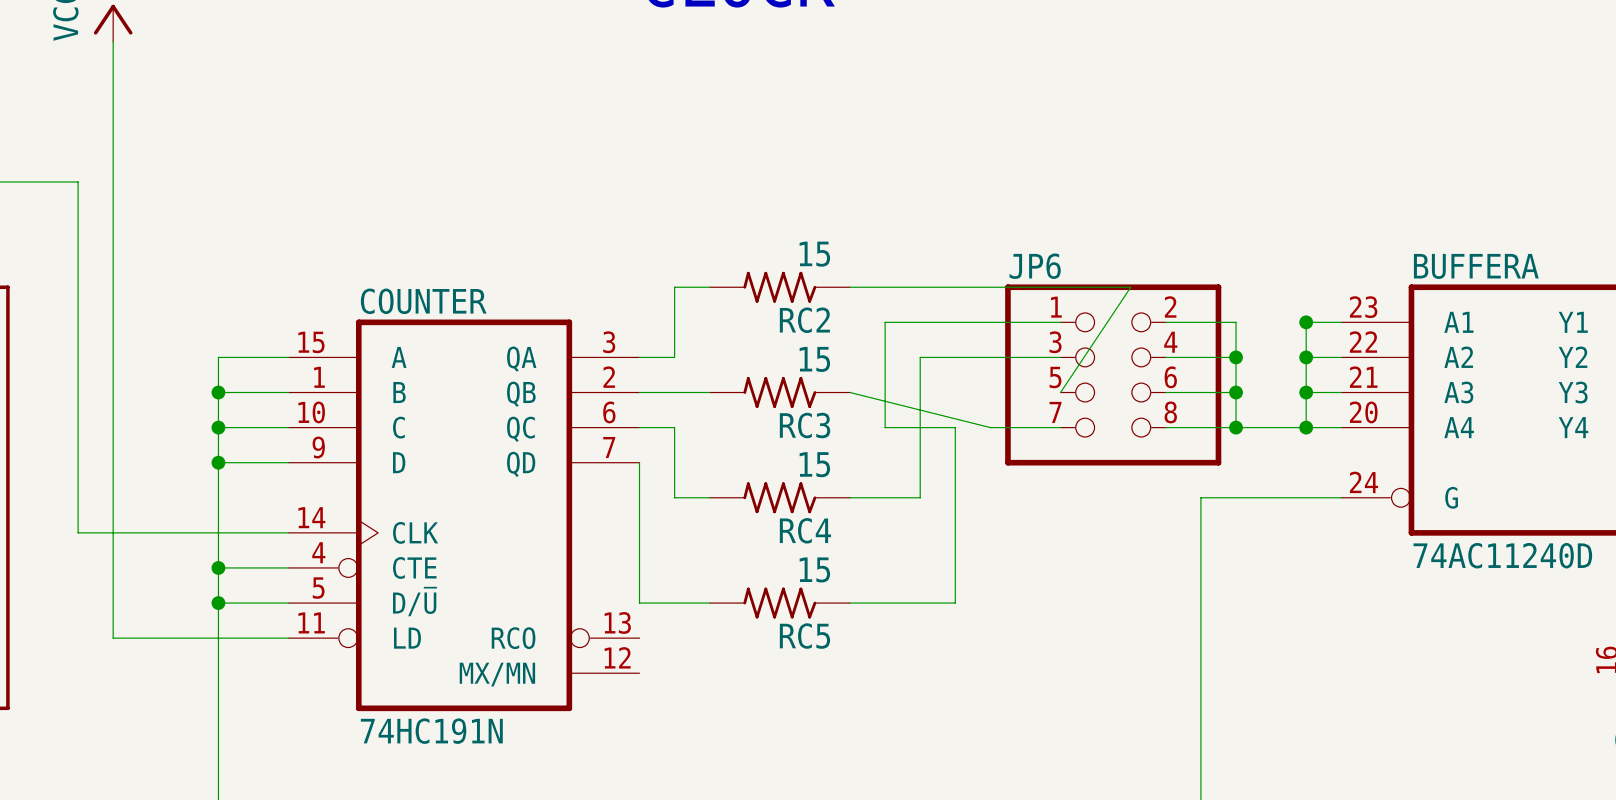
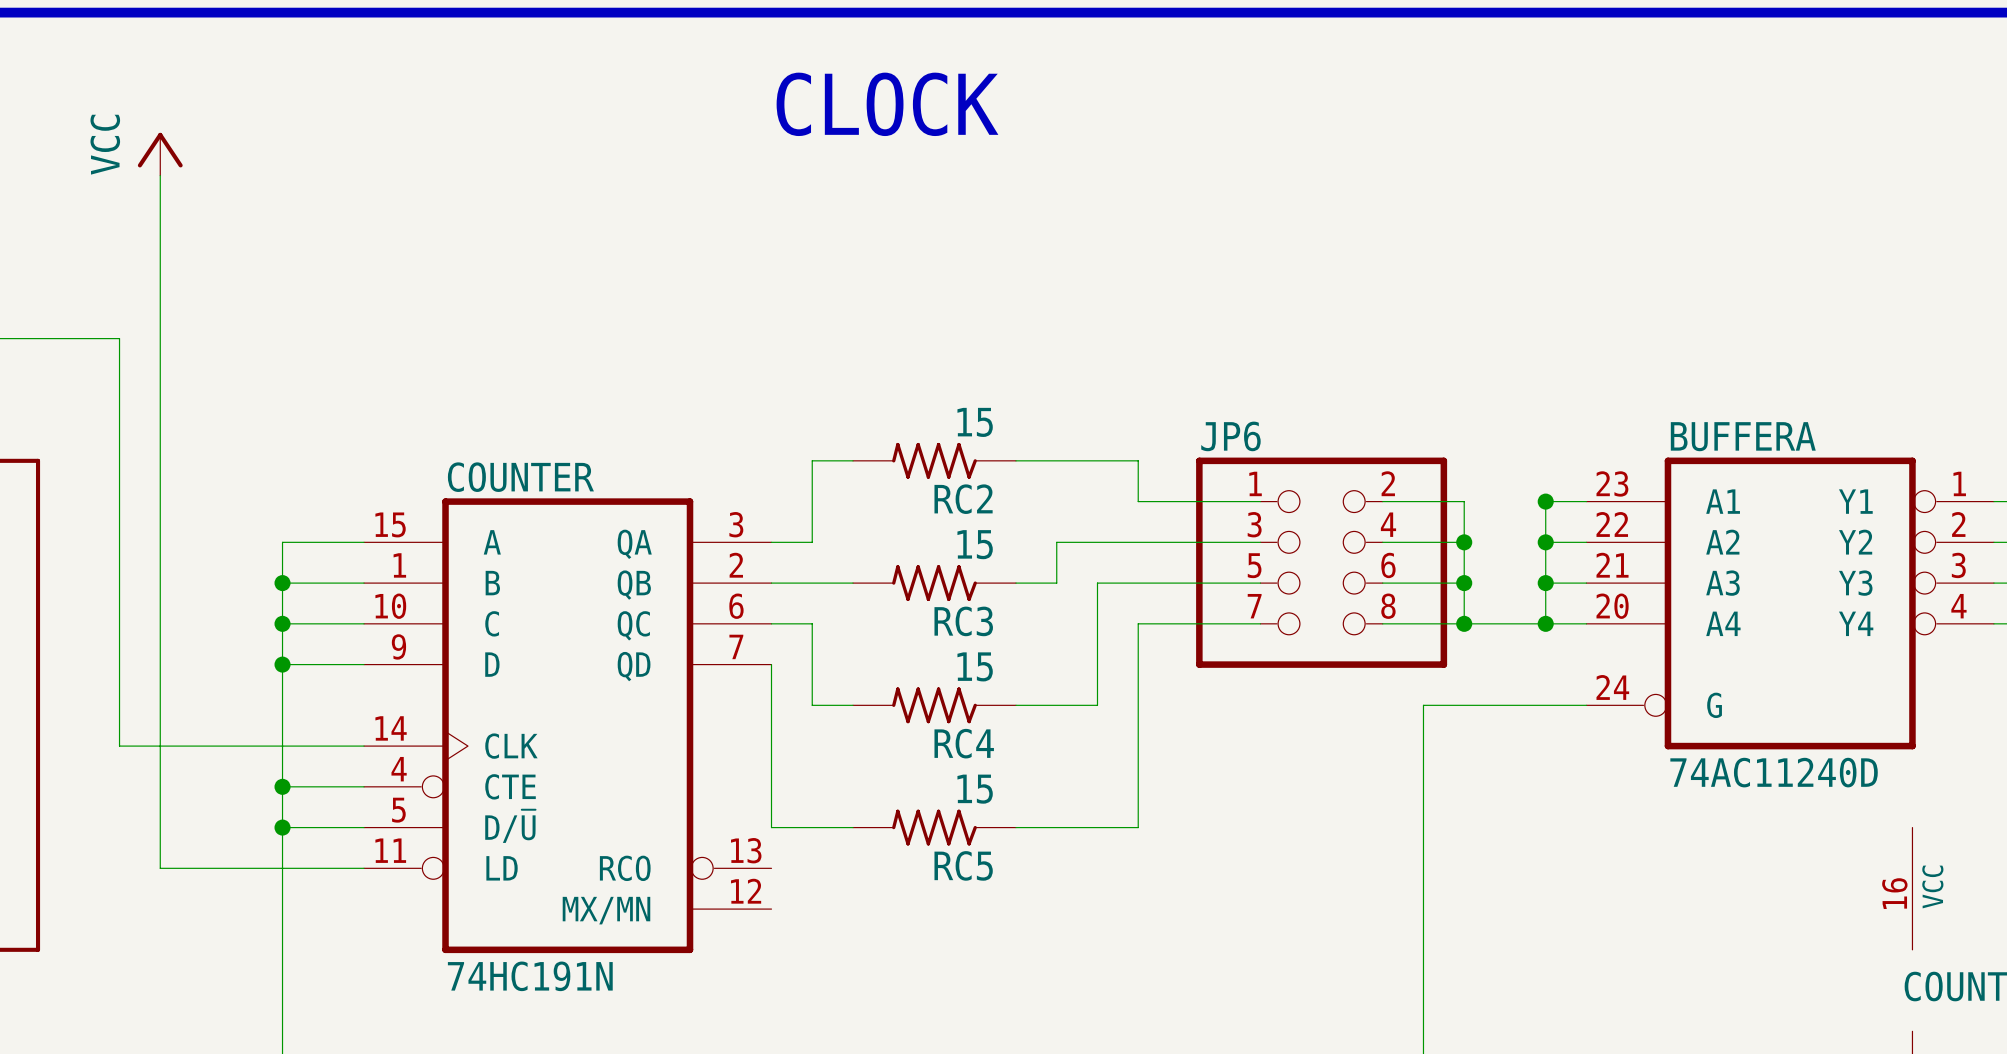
wire: (955, 287) (1130, 287) (1060, 392) -> (1097, 583) (1260, 583)
wire: (955, 322) (885, 322) (885, 357) -> (1097, 542) (1056, 542)
wire: (920, 357) (920, 392) -> (1138, 460) (1138, 501)
wire: (850, 392) (990, 427) -> (1015, 583) (1056, 583)
wire: (885, 392) (885, 427) (955, 427) -> (1178, 623) (1138, 623)

